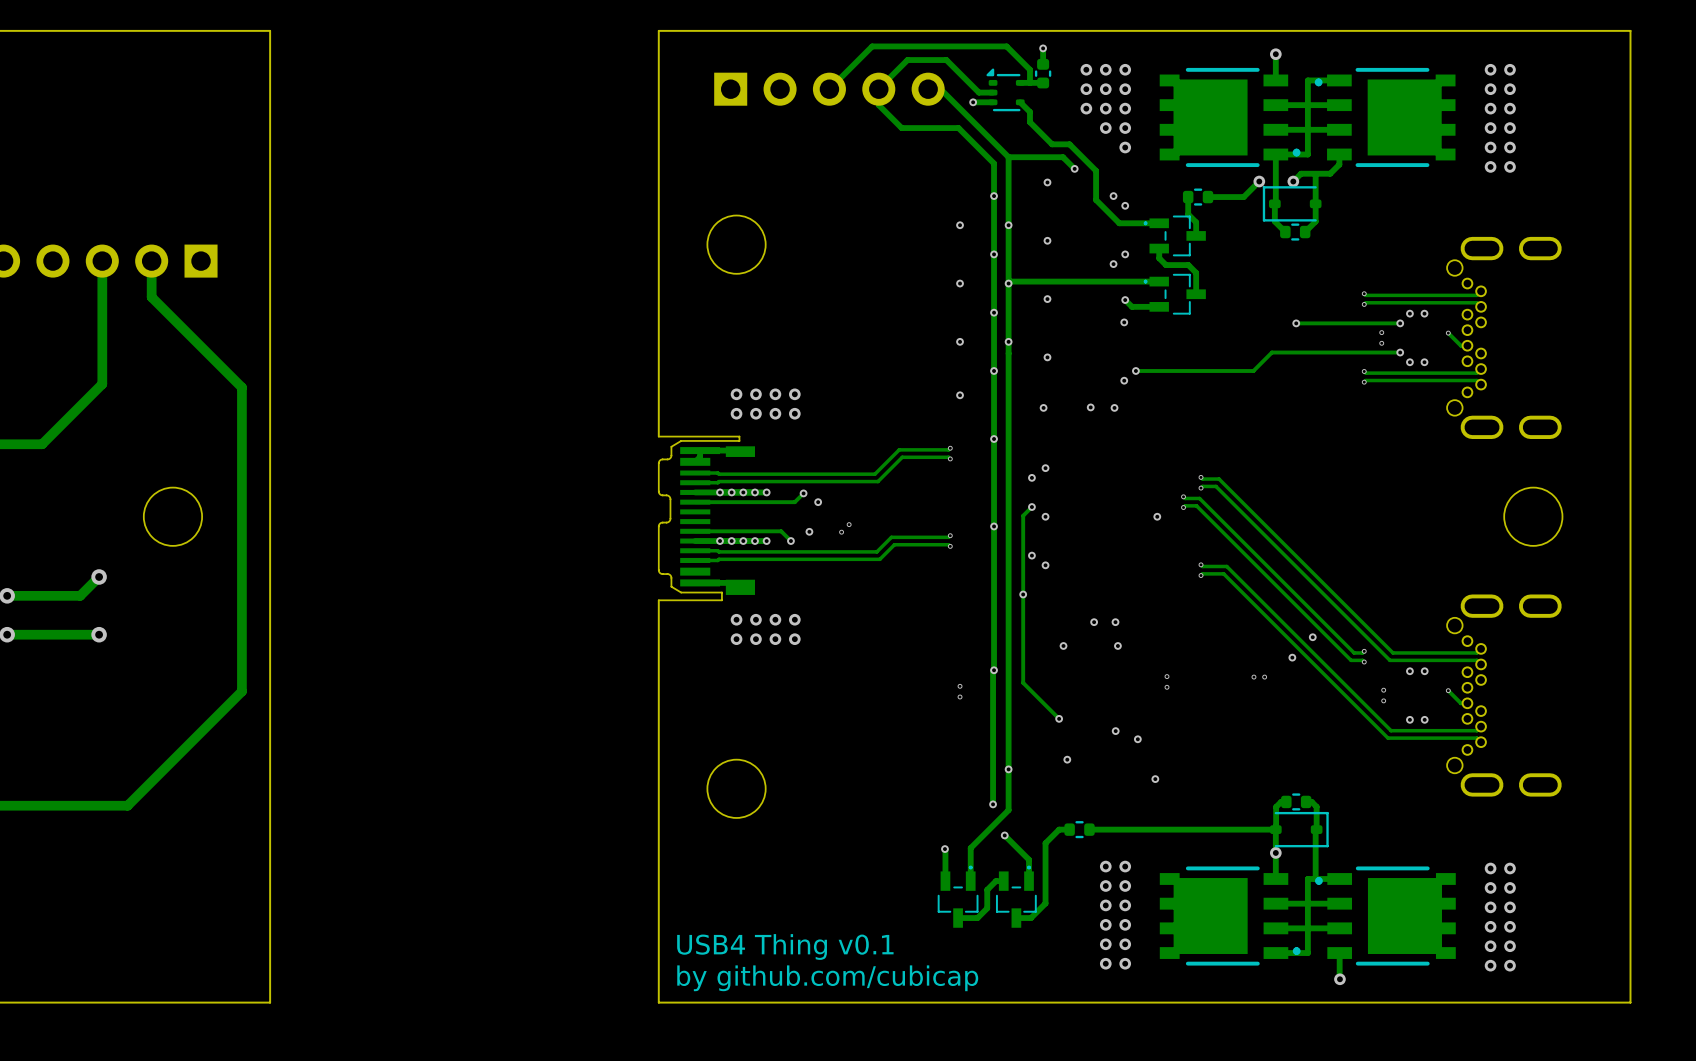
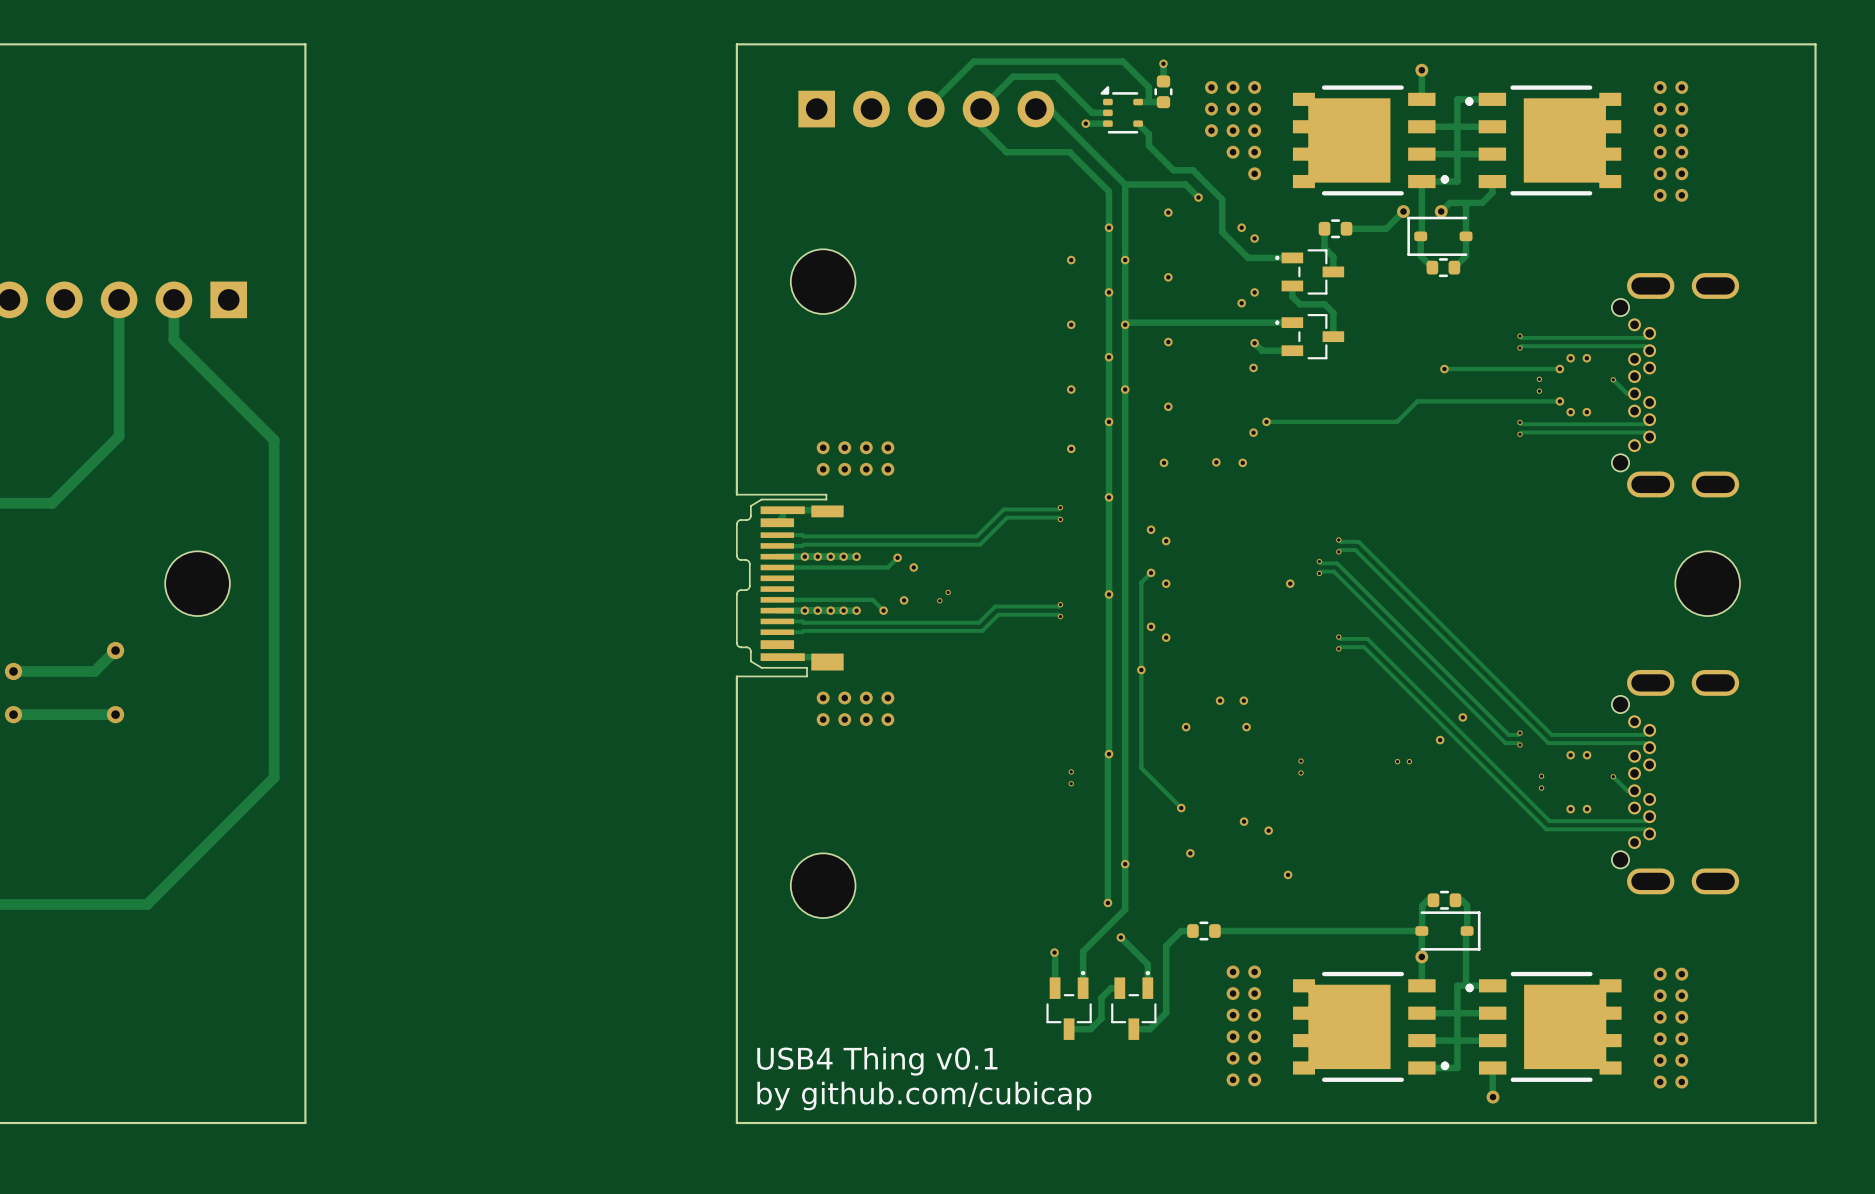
via: none -> (1151, 529)
via: (1045, 468) -> none
via: (1031, 477) -> none
via: none -> (1166, 541)

